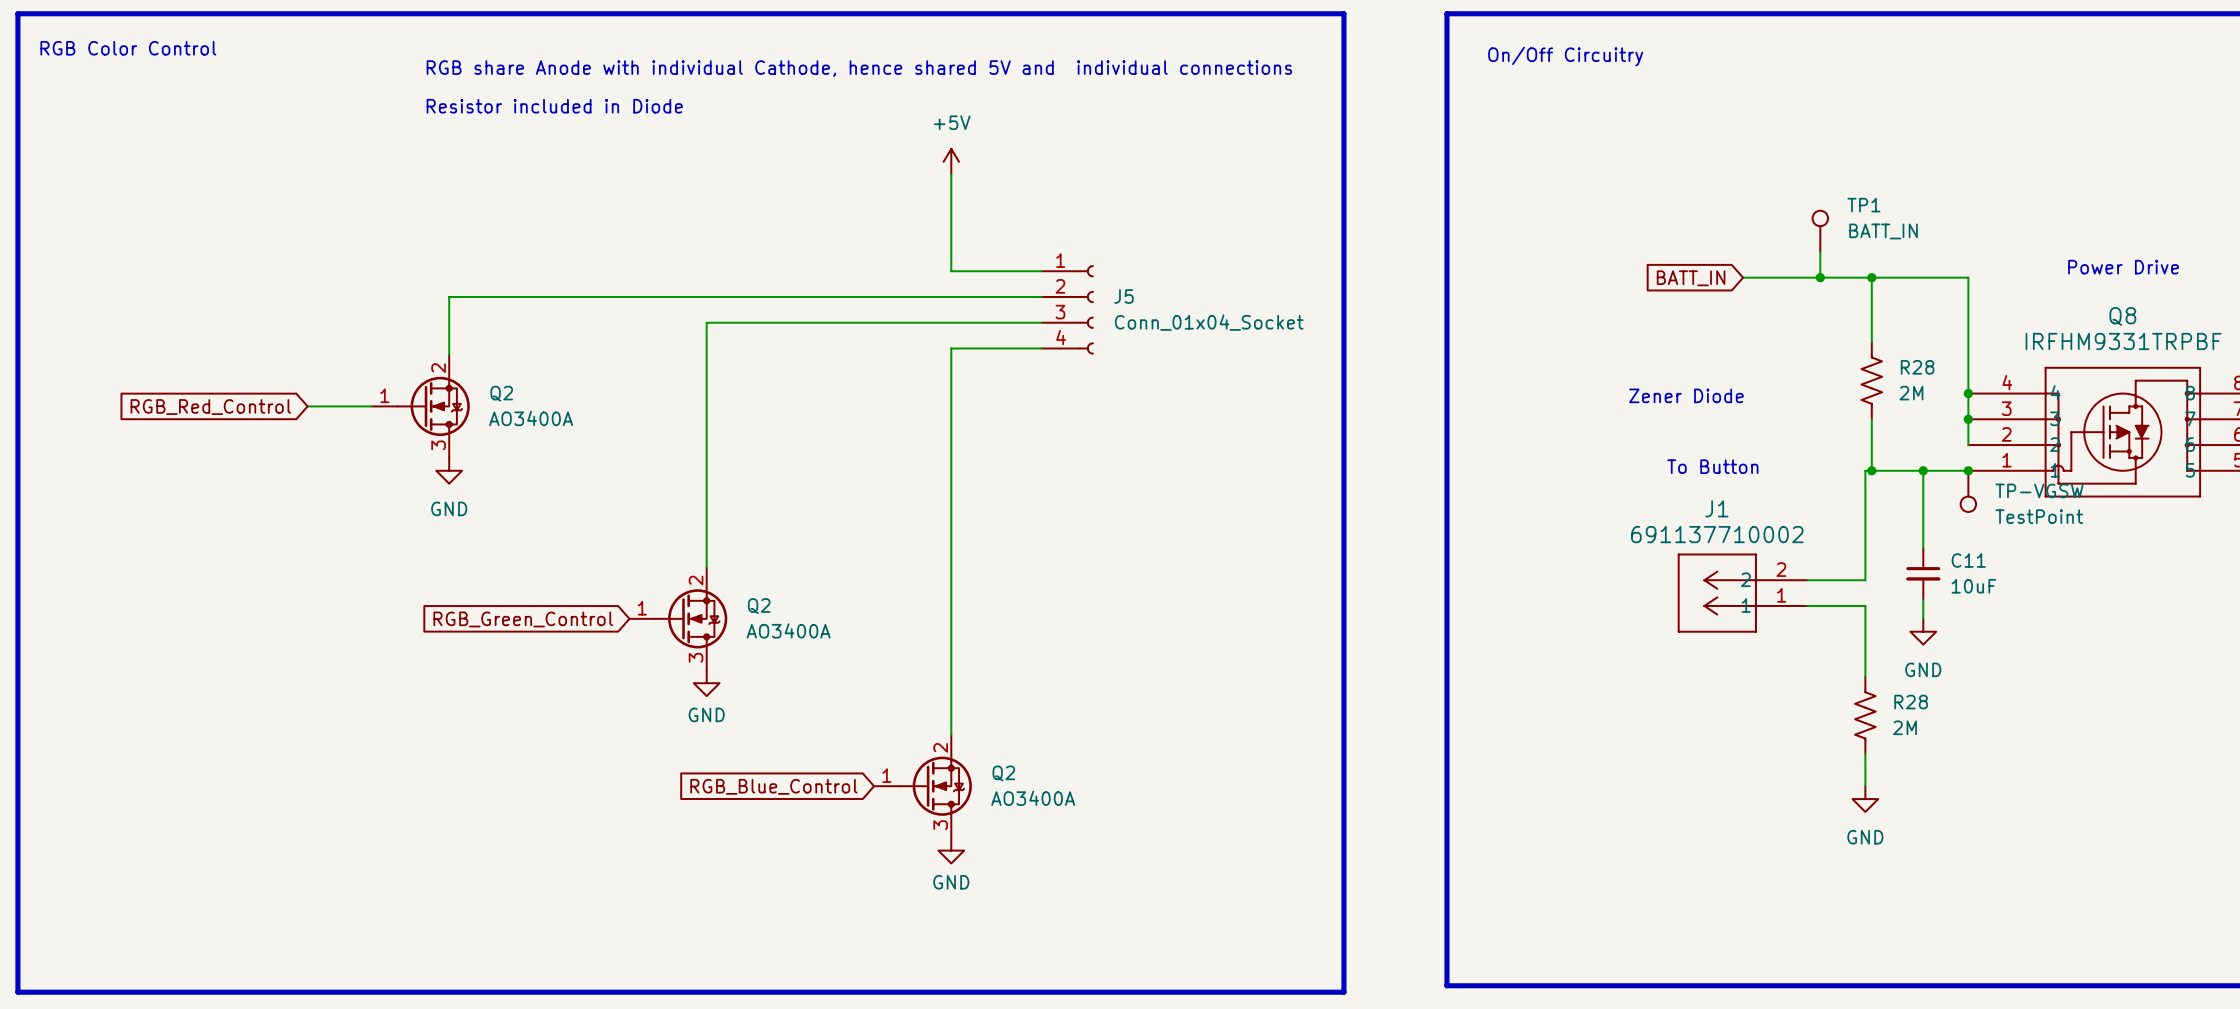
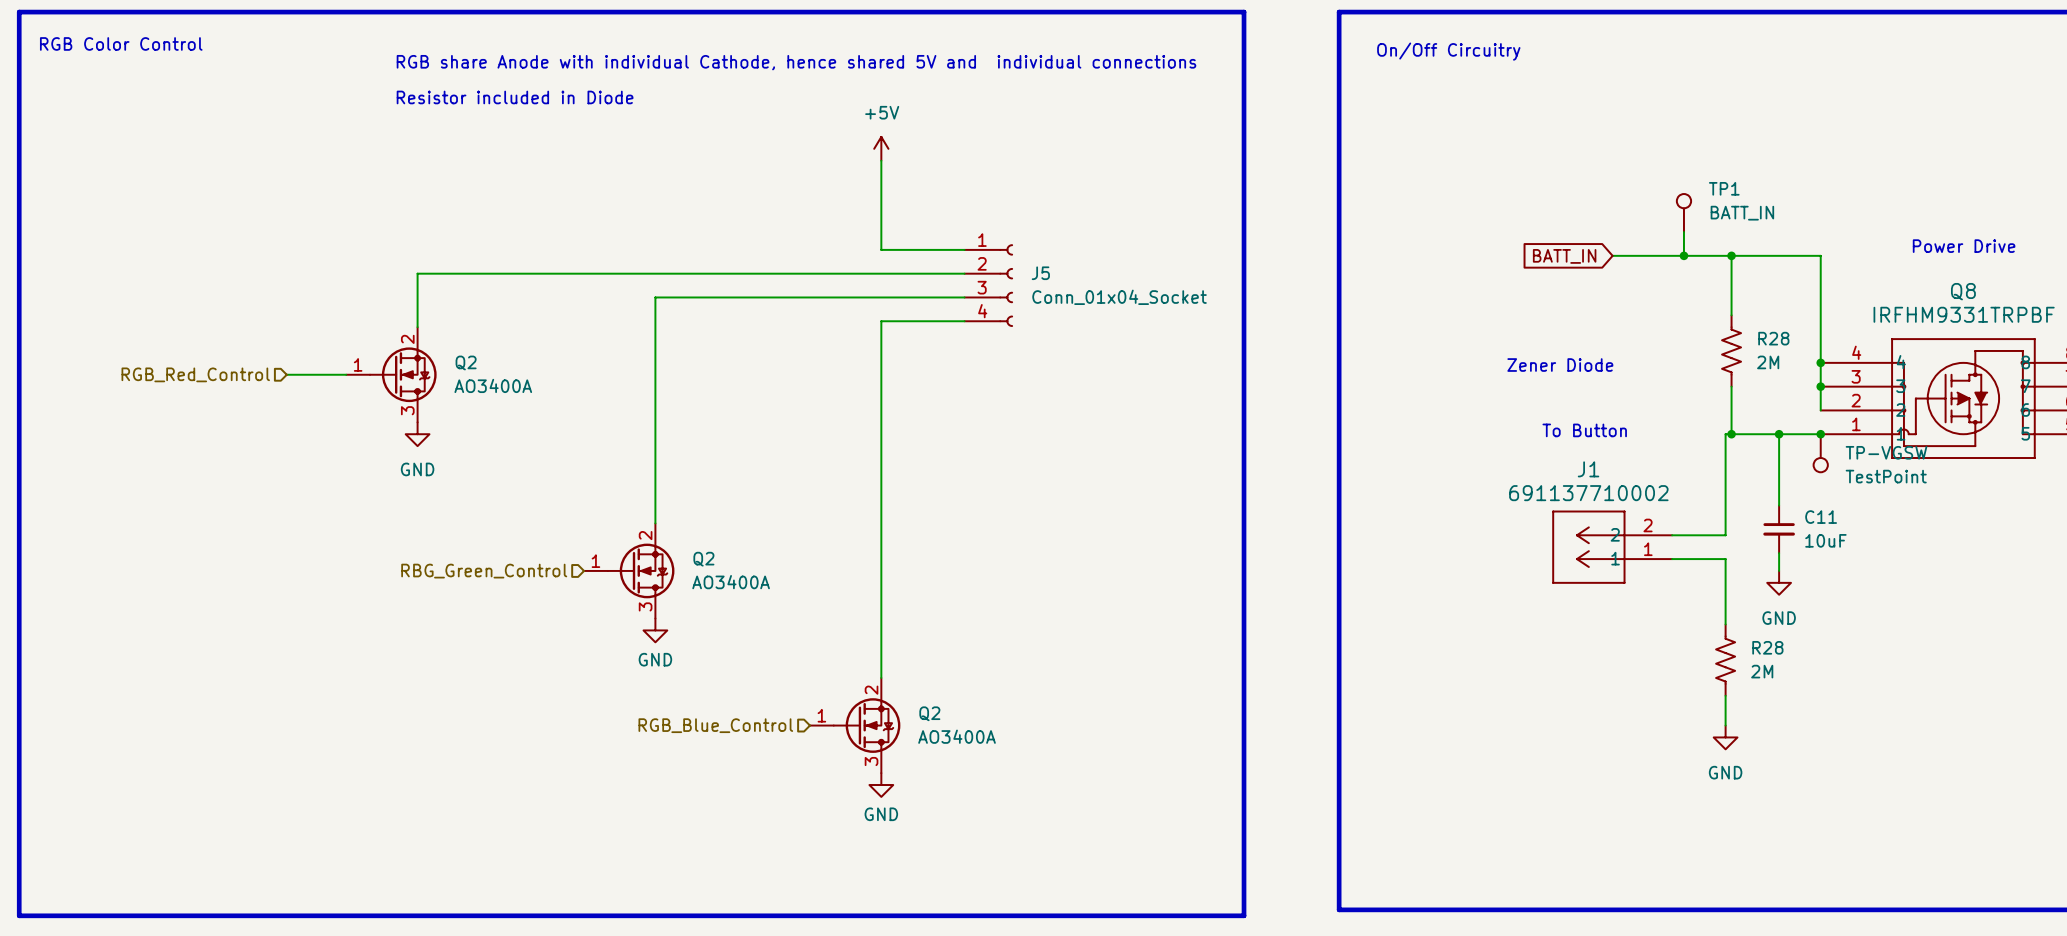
hierarchical label: none -> RGB_Red_Control (195, 374)
global label: RGB_Red_Control (210, 407) -> none
hierarchical label: none -> RBG_Green_Control (484, 571)
global label: RGB_Green_Control (523, 619) -> none
hierarchical label: none -> RGB_Blue_Control (715, 725)
global label: RGB_Blue_Control (773, 786) -> none

